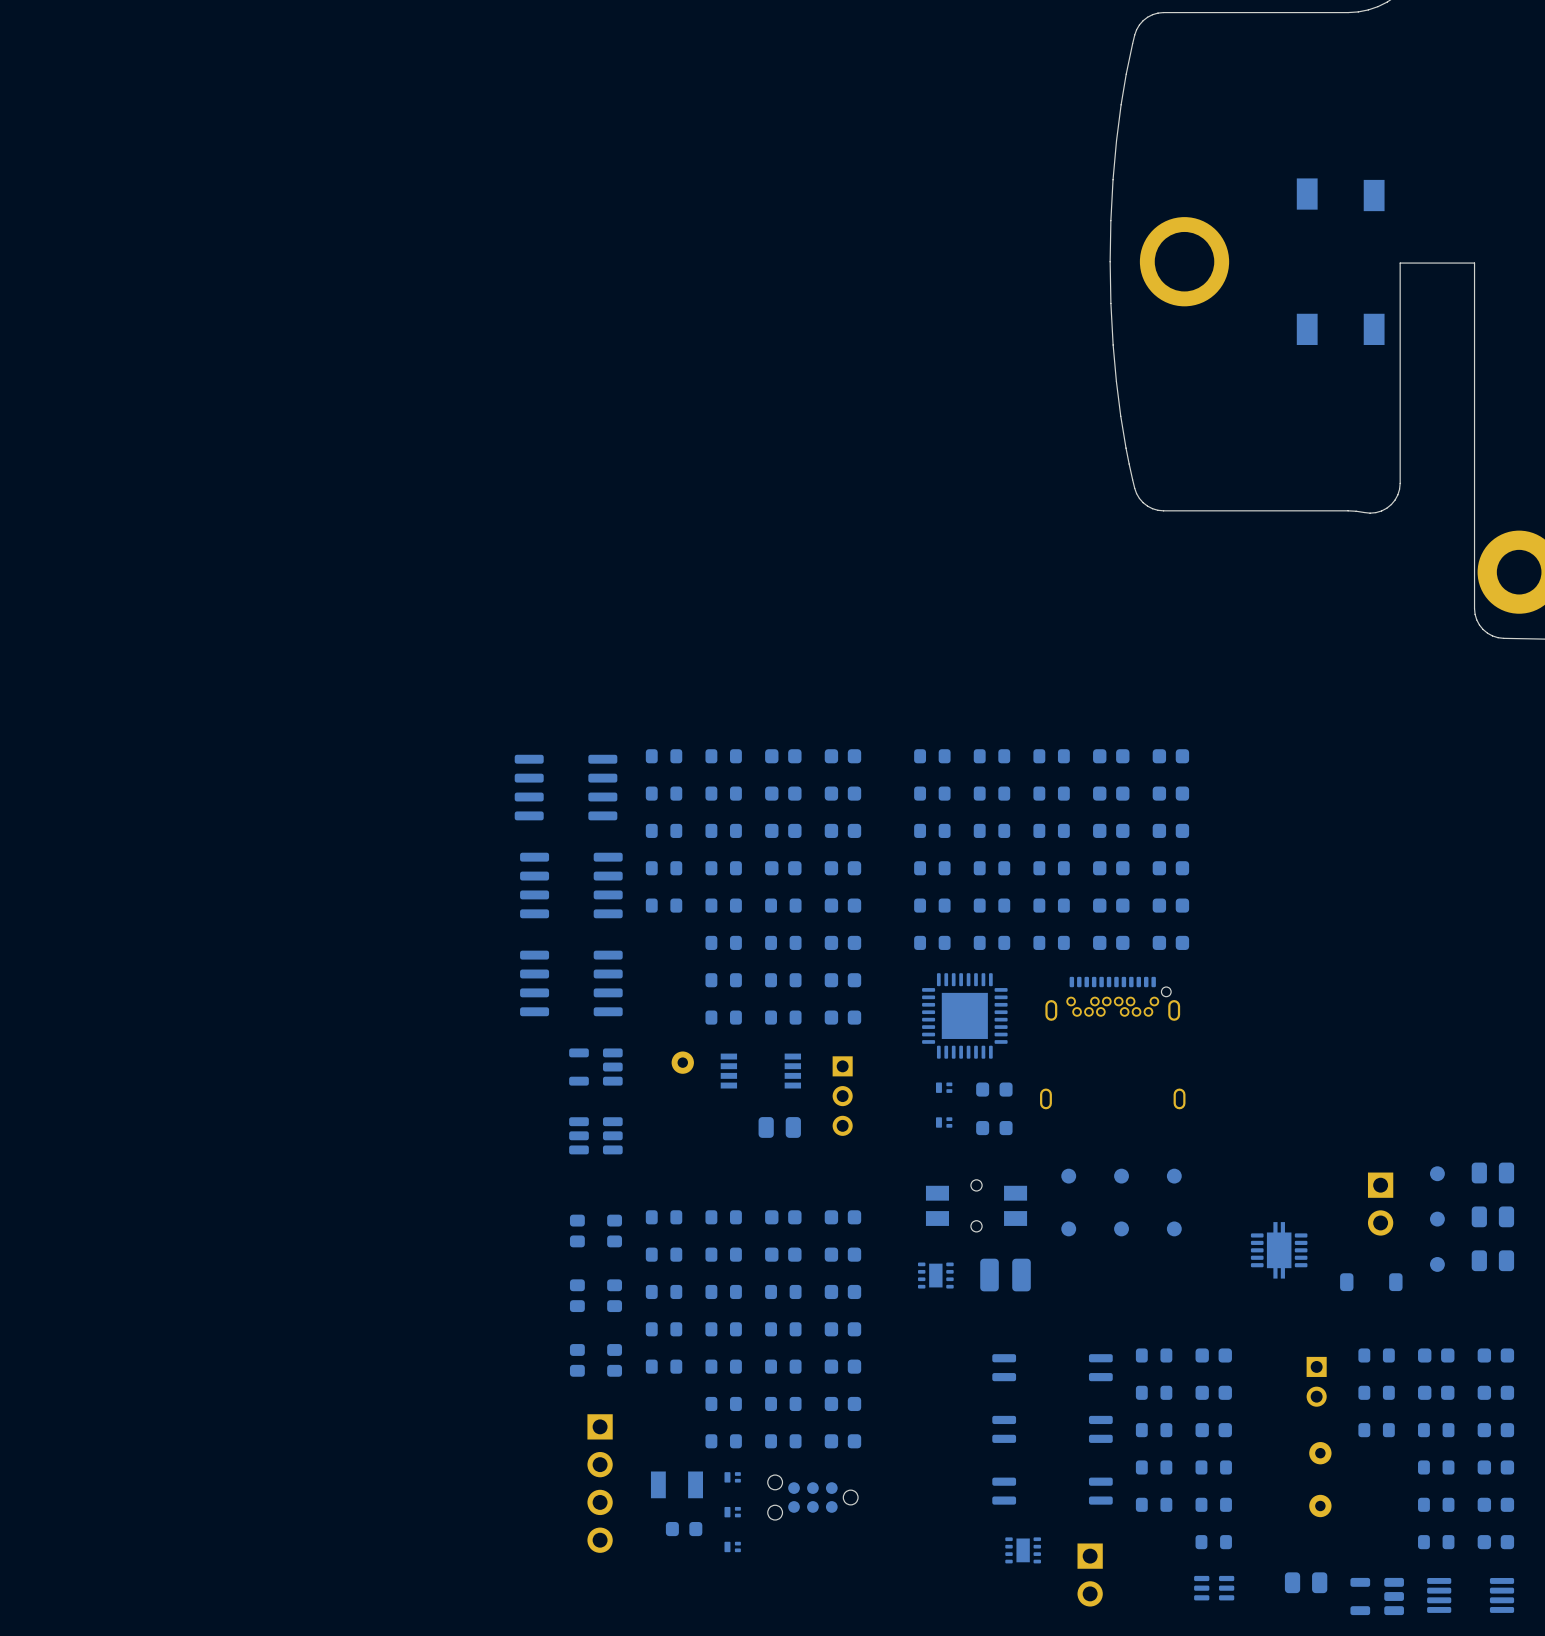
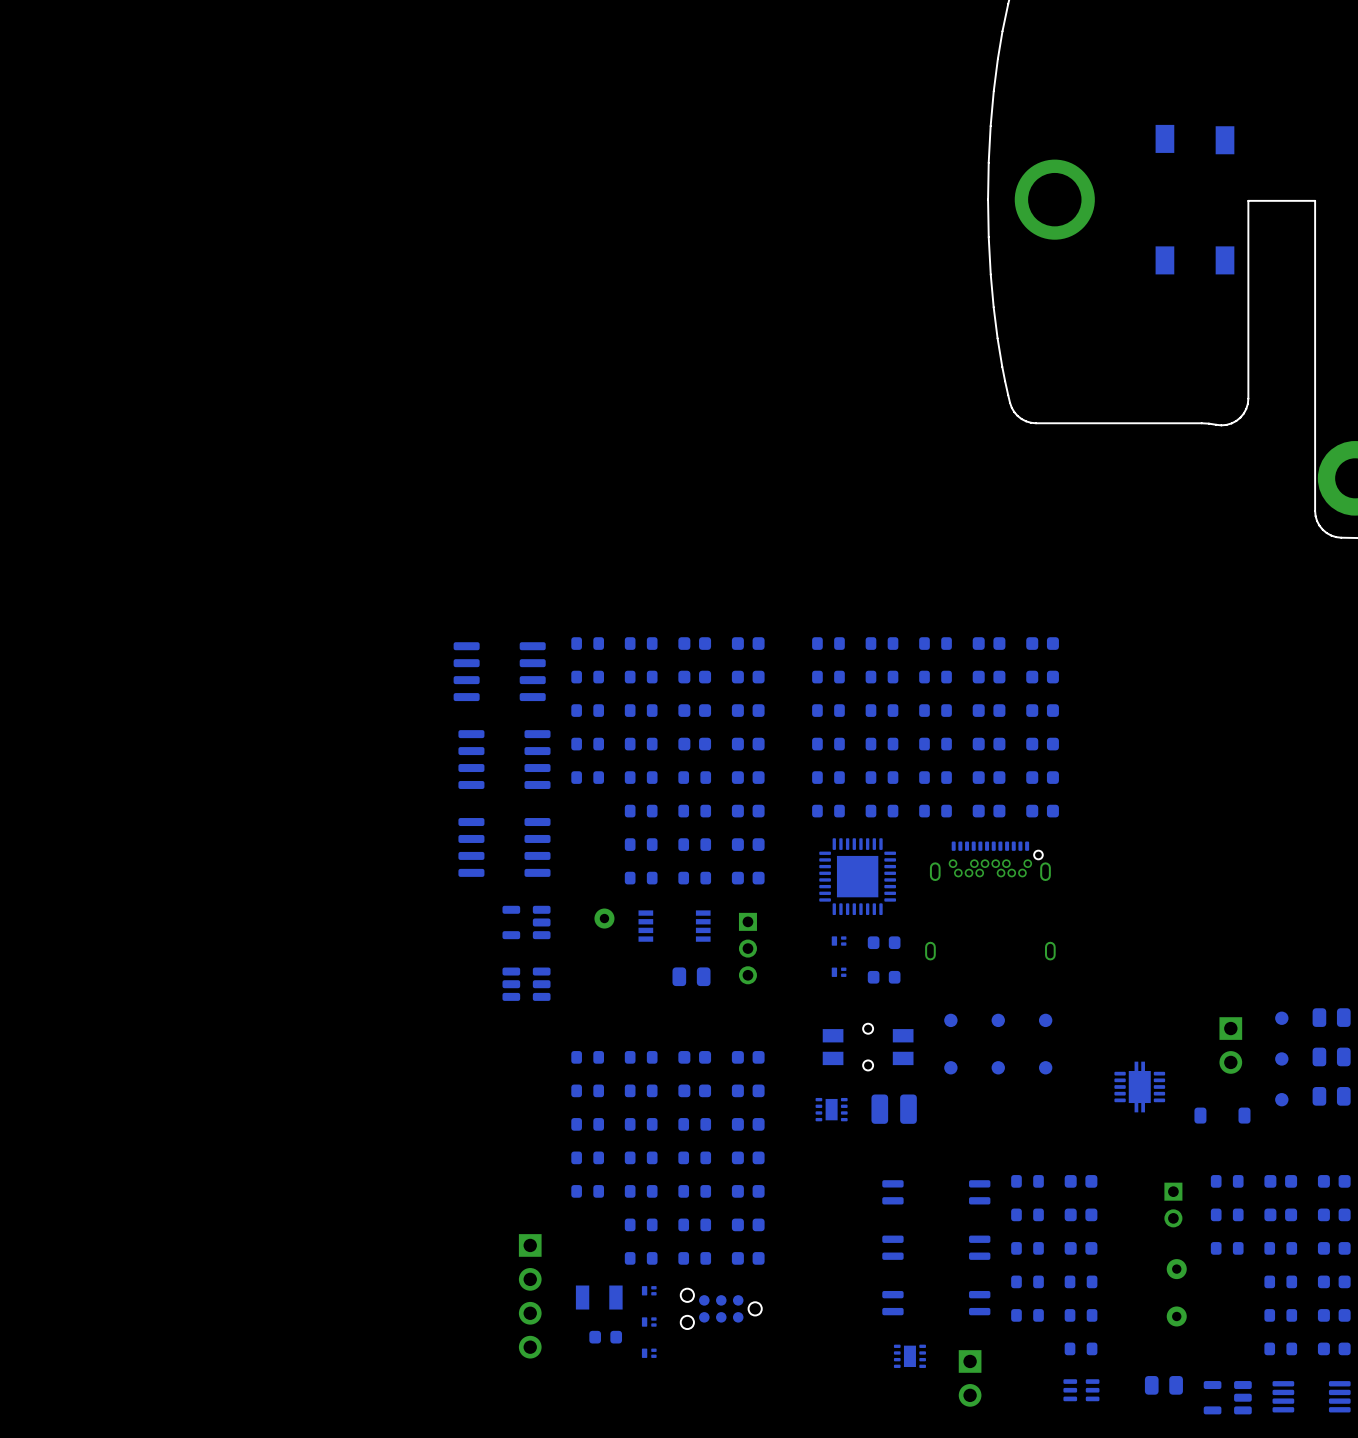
part: (595, 1230) -> none
part: (595, 1295) -> none
part: (595, 1360) -> none

